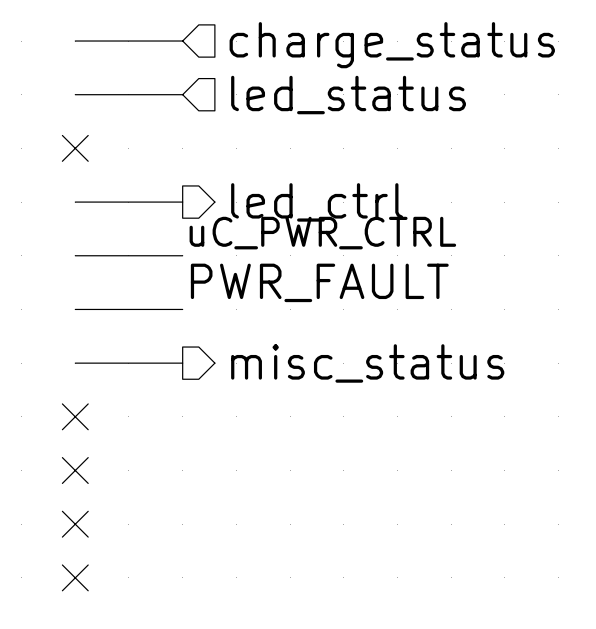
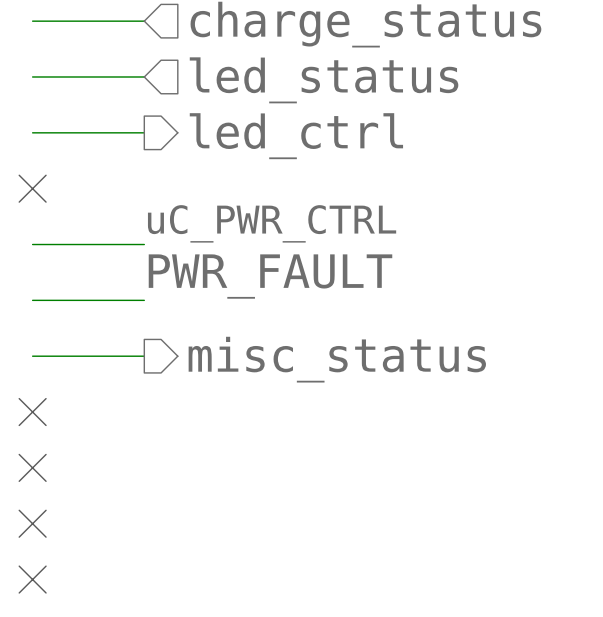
no-connect mark position: (75, 148) -> (32, 188)
wire: (75, 202) (182, 202) -> (32, 132) (144, 132)
hierarchical label position: led_ctrl (317, 202) -> led_ctrl (296, 136)

